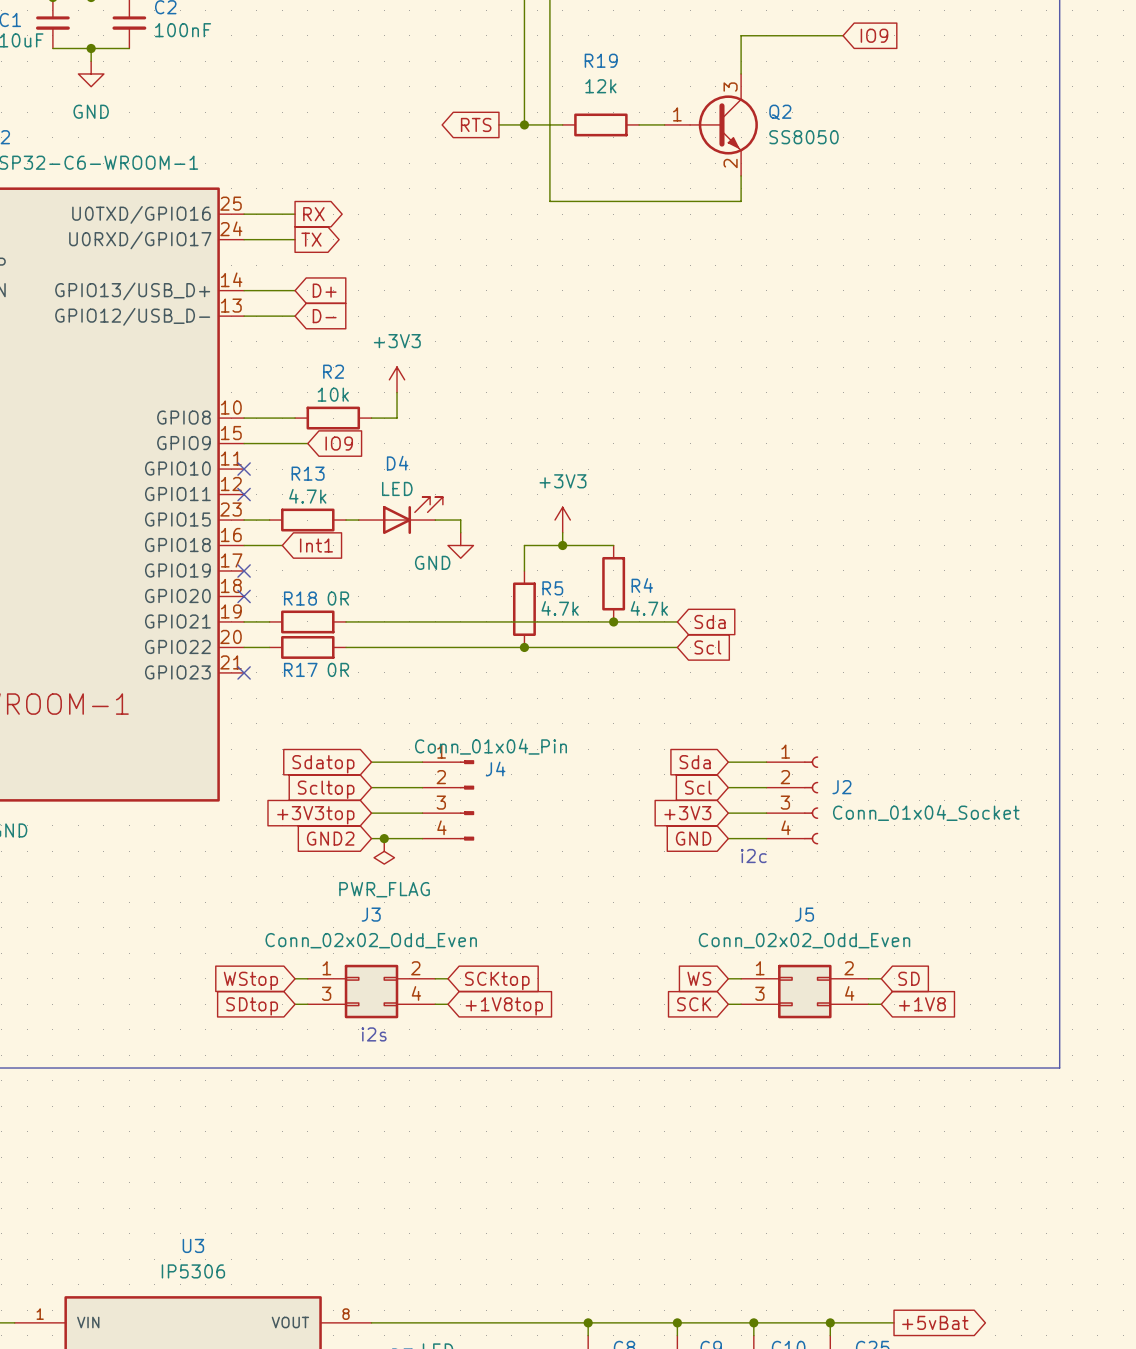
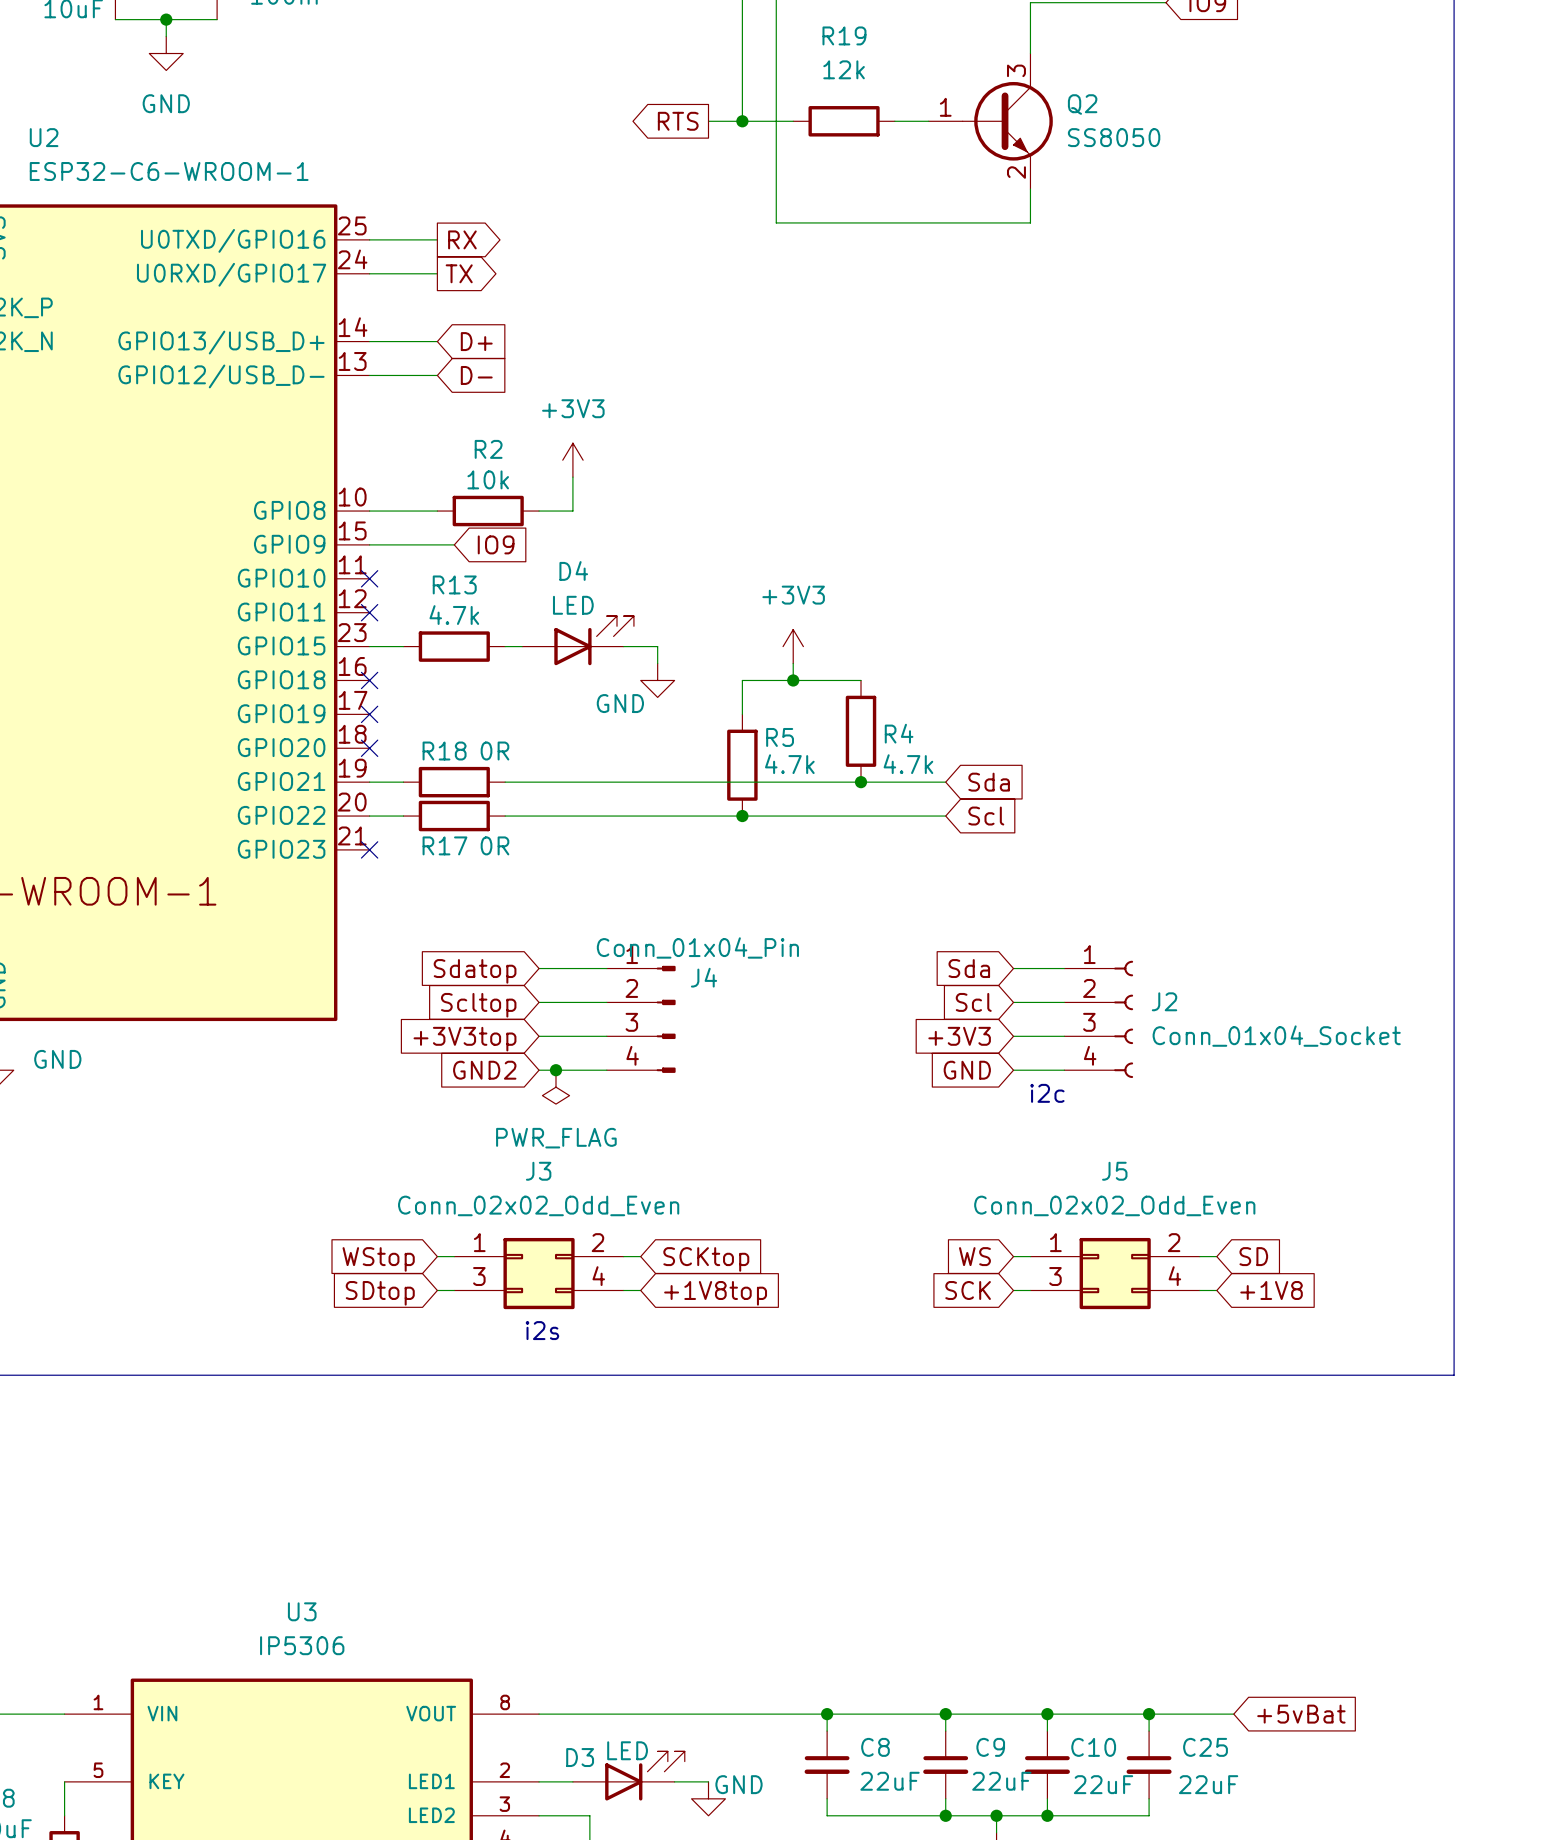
wire: (244, 545) (282, 545) -> none
no-connect mark: none -> (369, 680)
global label: Int1 (316, 545) -> none
global label shape: output (935, 1322) -> input (1301, 1714)

